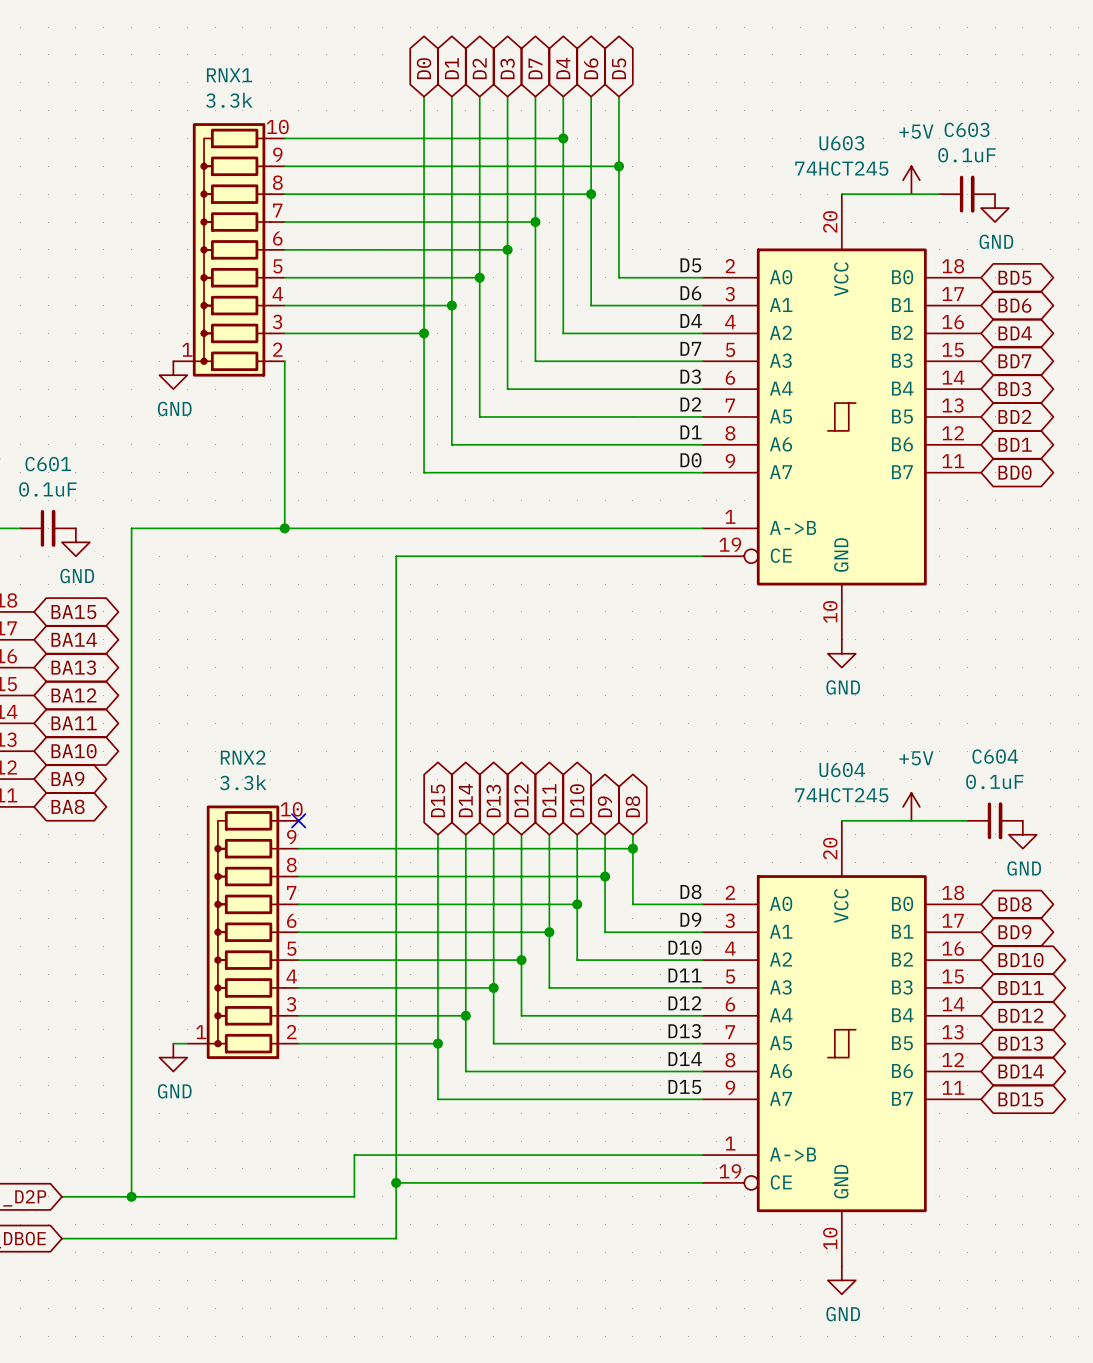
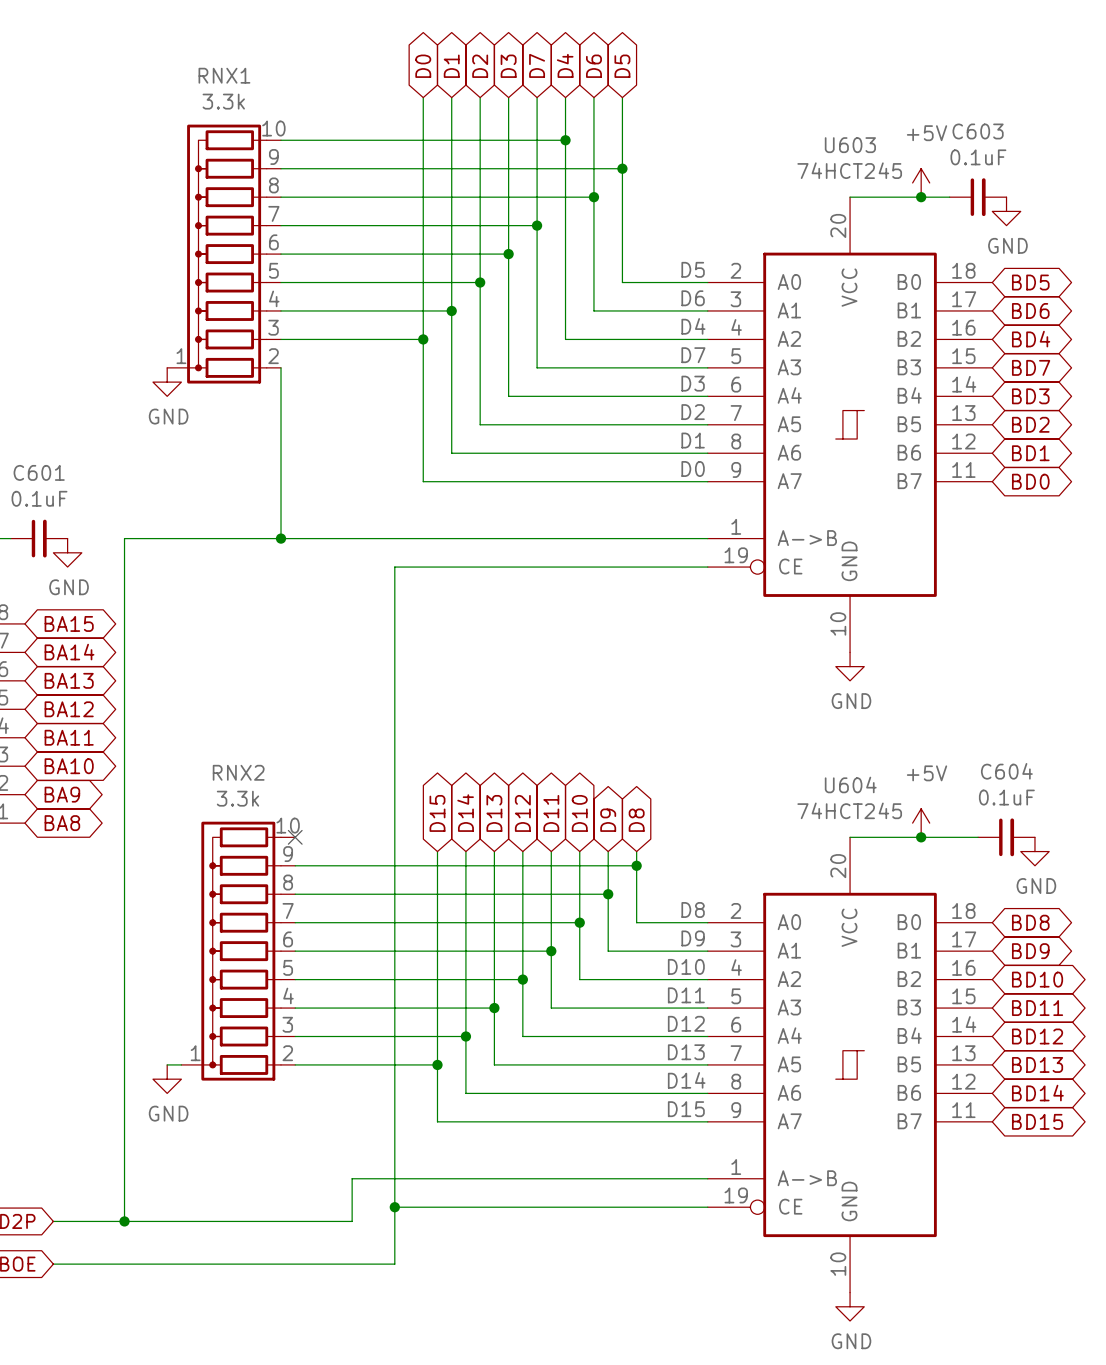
junction: none -> (921, 197)
junction: none -> (921, 837)

